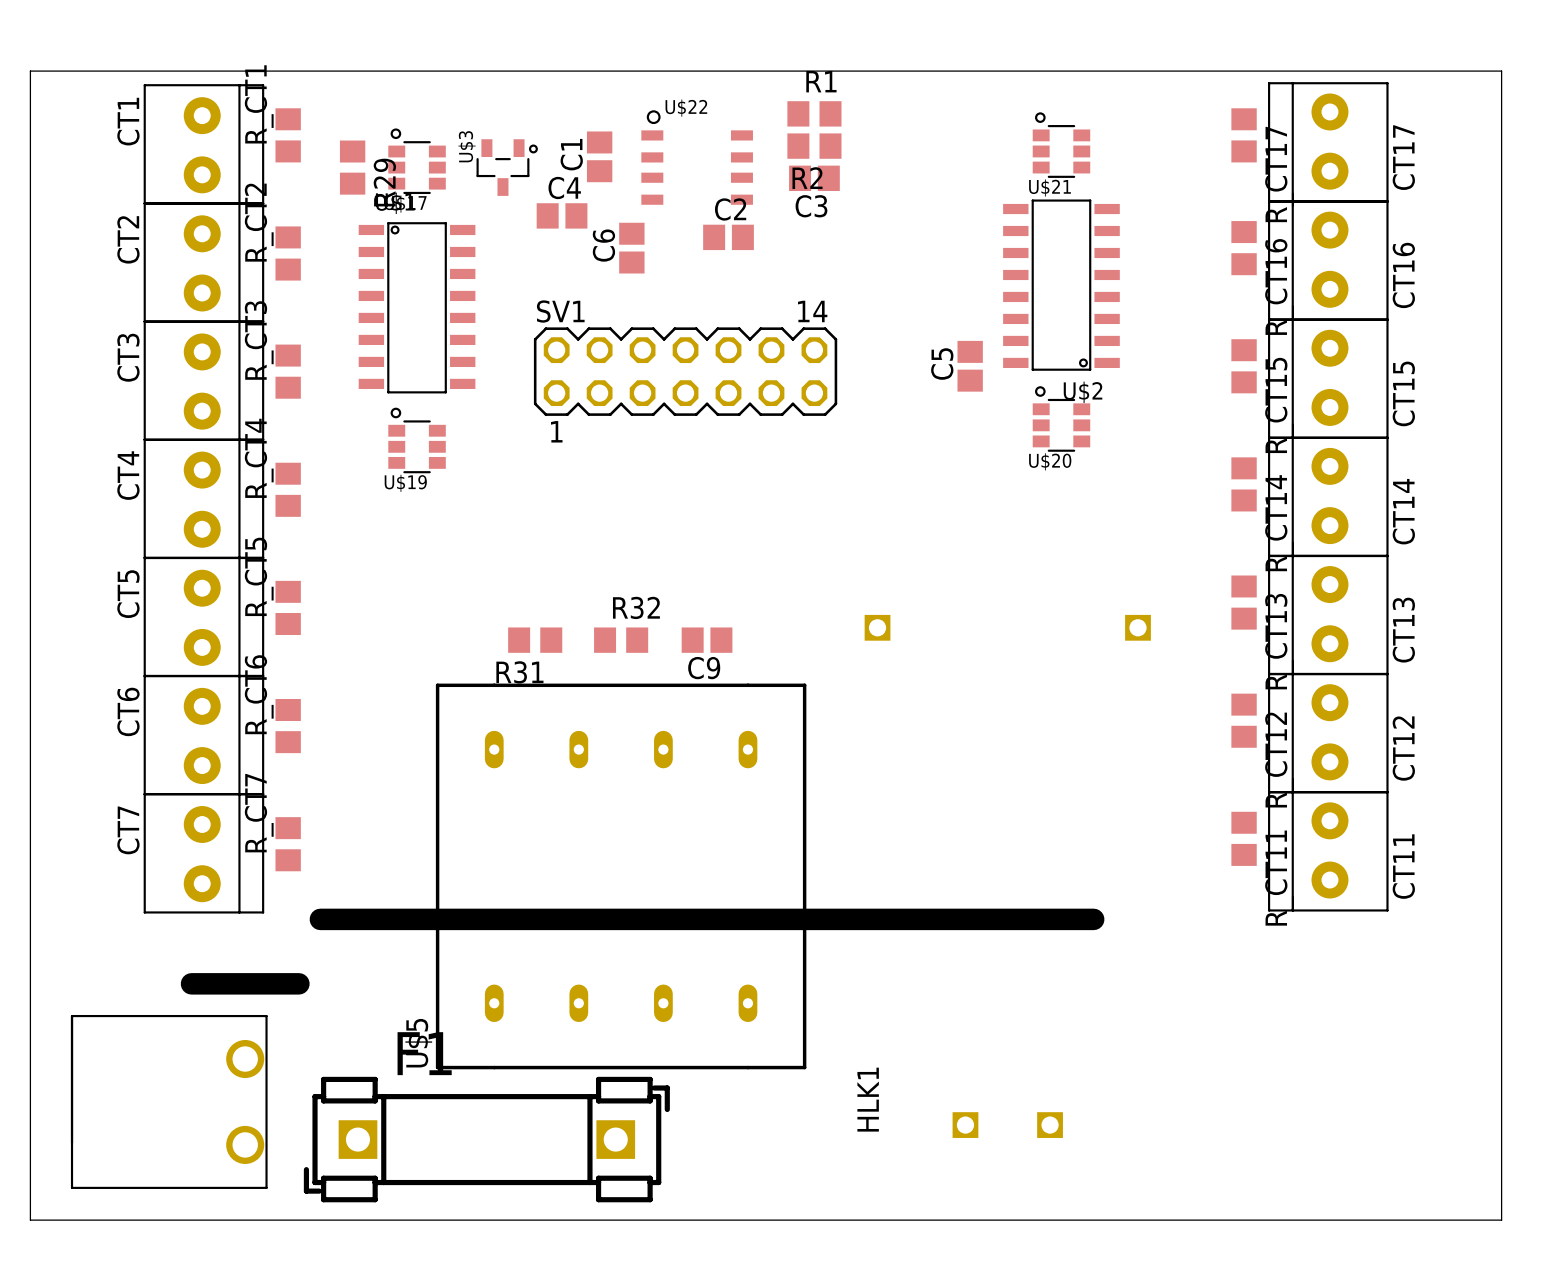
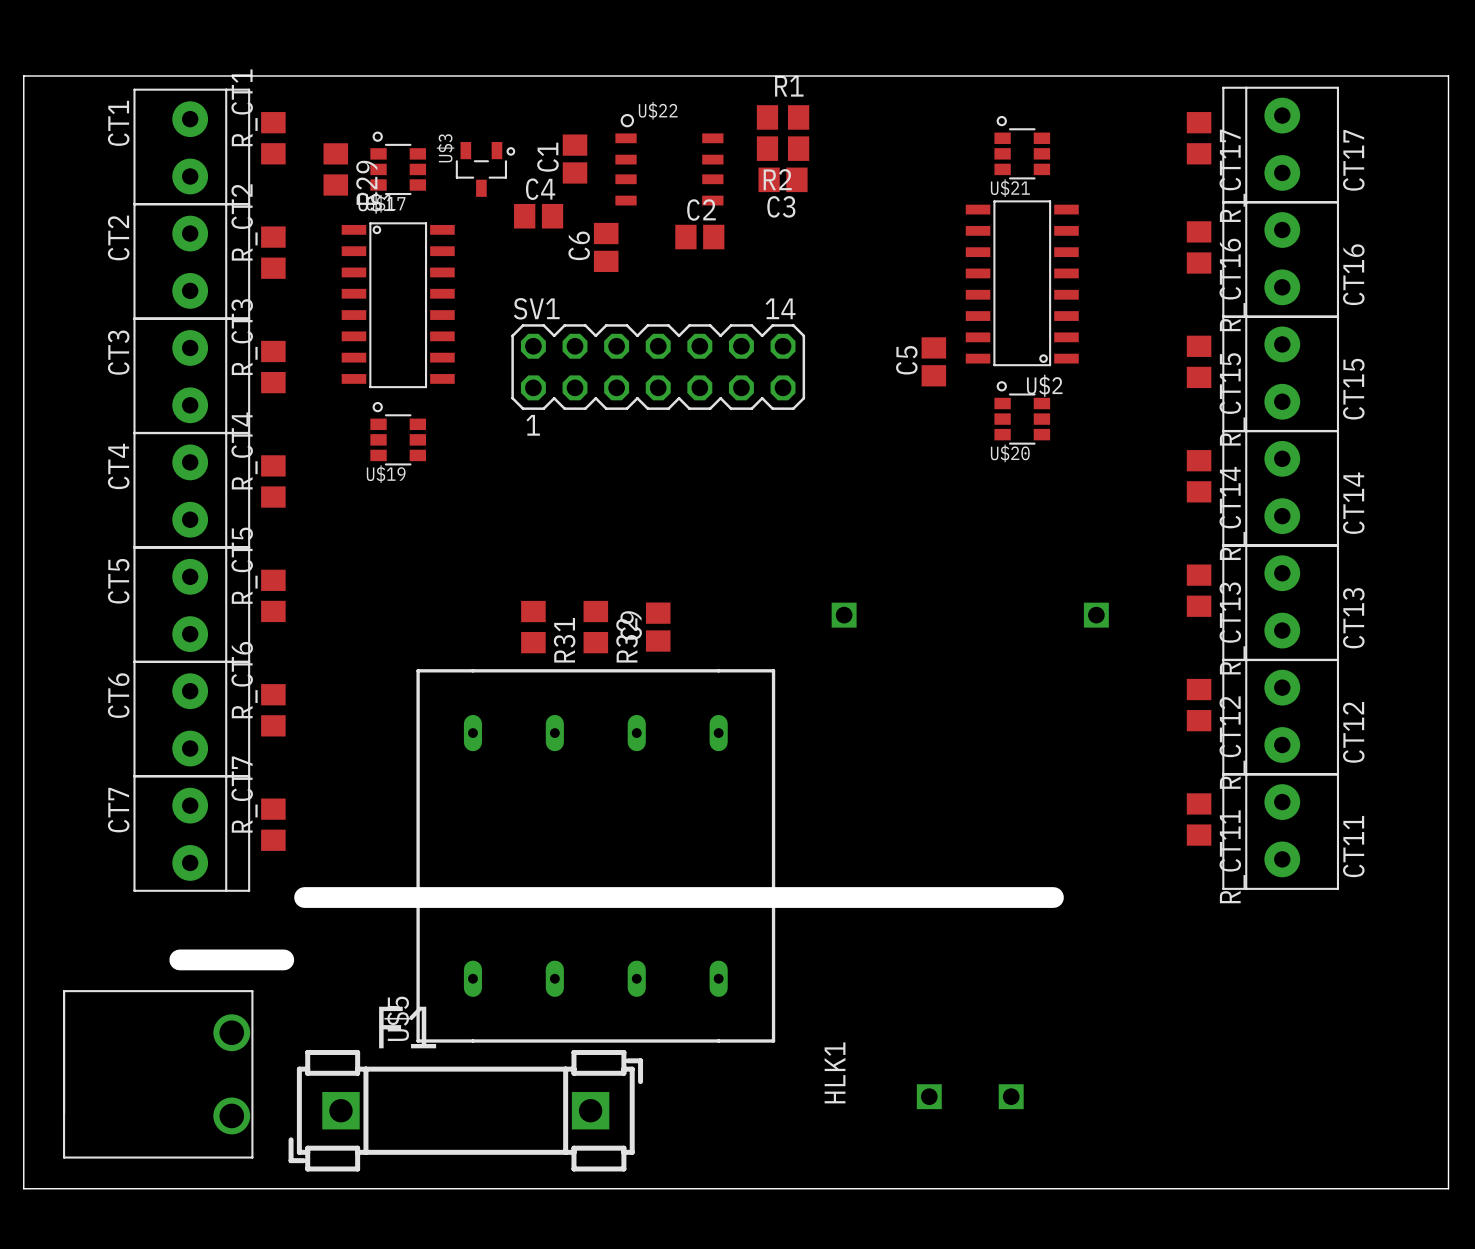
R31 rotation: 0° (535, 640) -> 90° clockwise (533, 627)
R32 rotation: 0° (621, 640) -> 90° clockwise (595, 627)
C9 rotation: 0° (707, 640) -> 90° clockwise (658, 627)
R31 name position: R31 (519, 672) -> R31 (564, 640)

